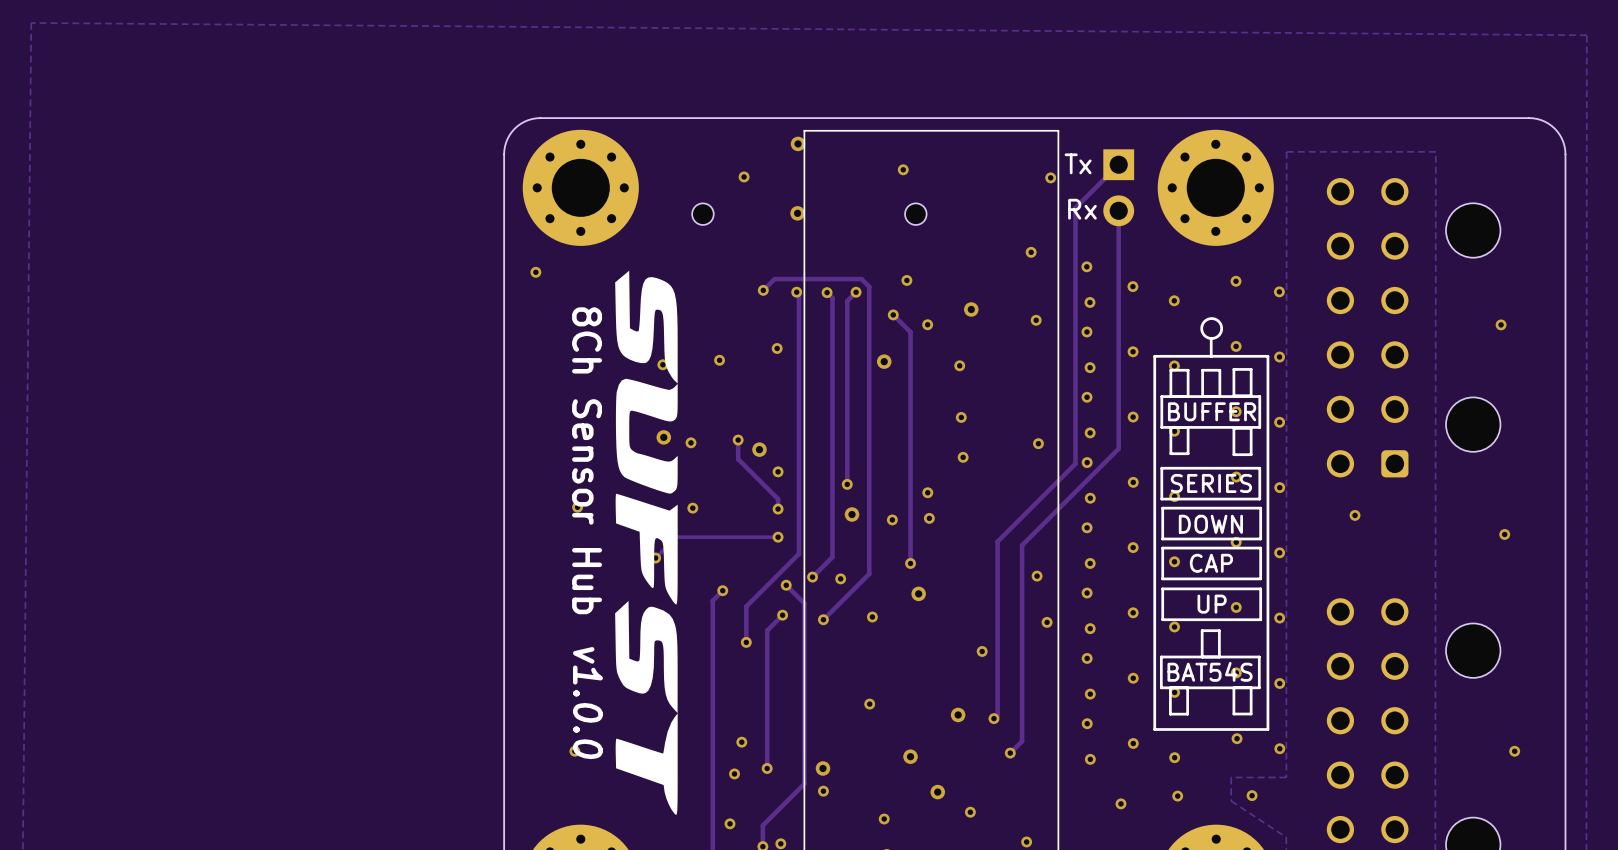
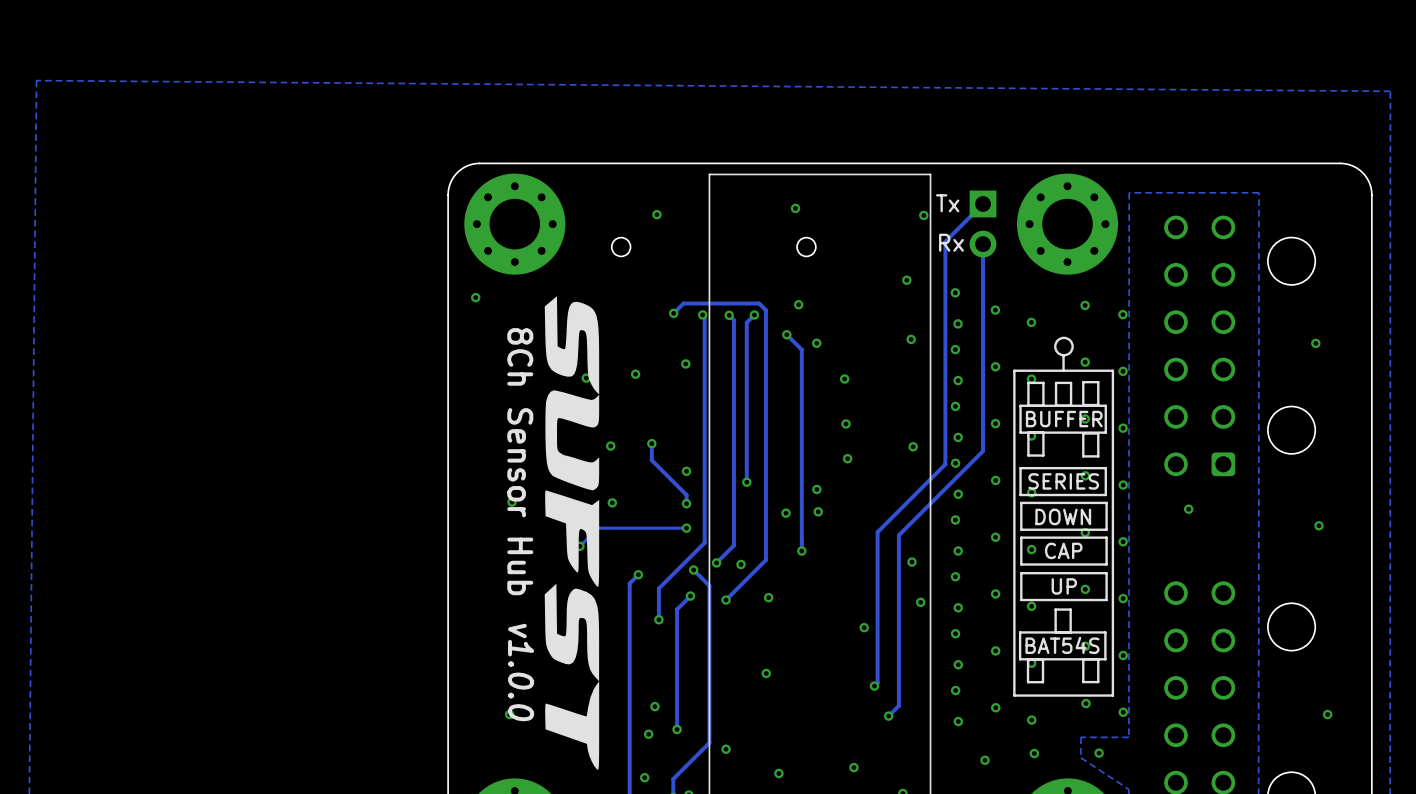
via: (798, 143) -> none
via: (797, 213) -> none
via: (971, 309) -> none
via: (884, 361) -> none
via: (663, 437) -> none
via: (759, 449) -> none
via: (852, 514) -> none
via: (918, 593) -> none
via: (958, 714) -> none
via: (910, 756) -> none
via: (822, 768) -> none
via: (937, 792) -> none

